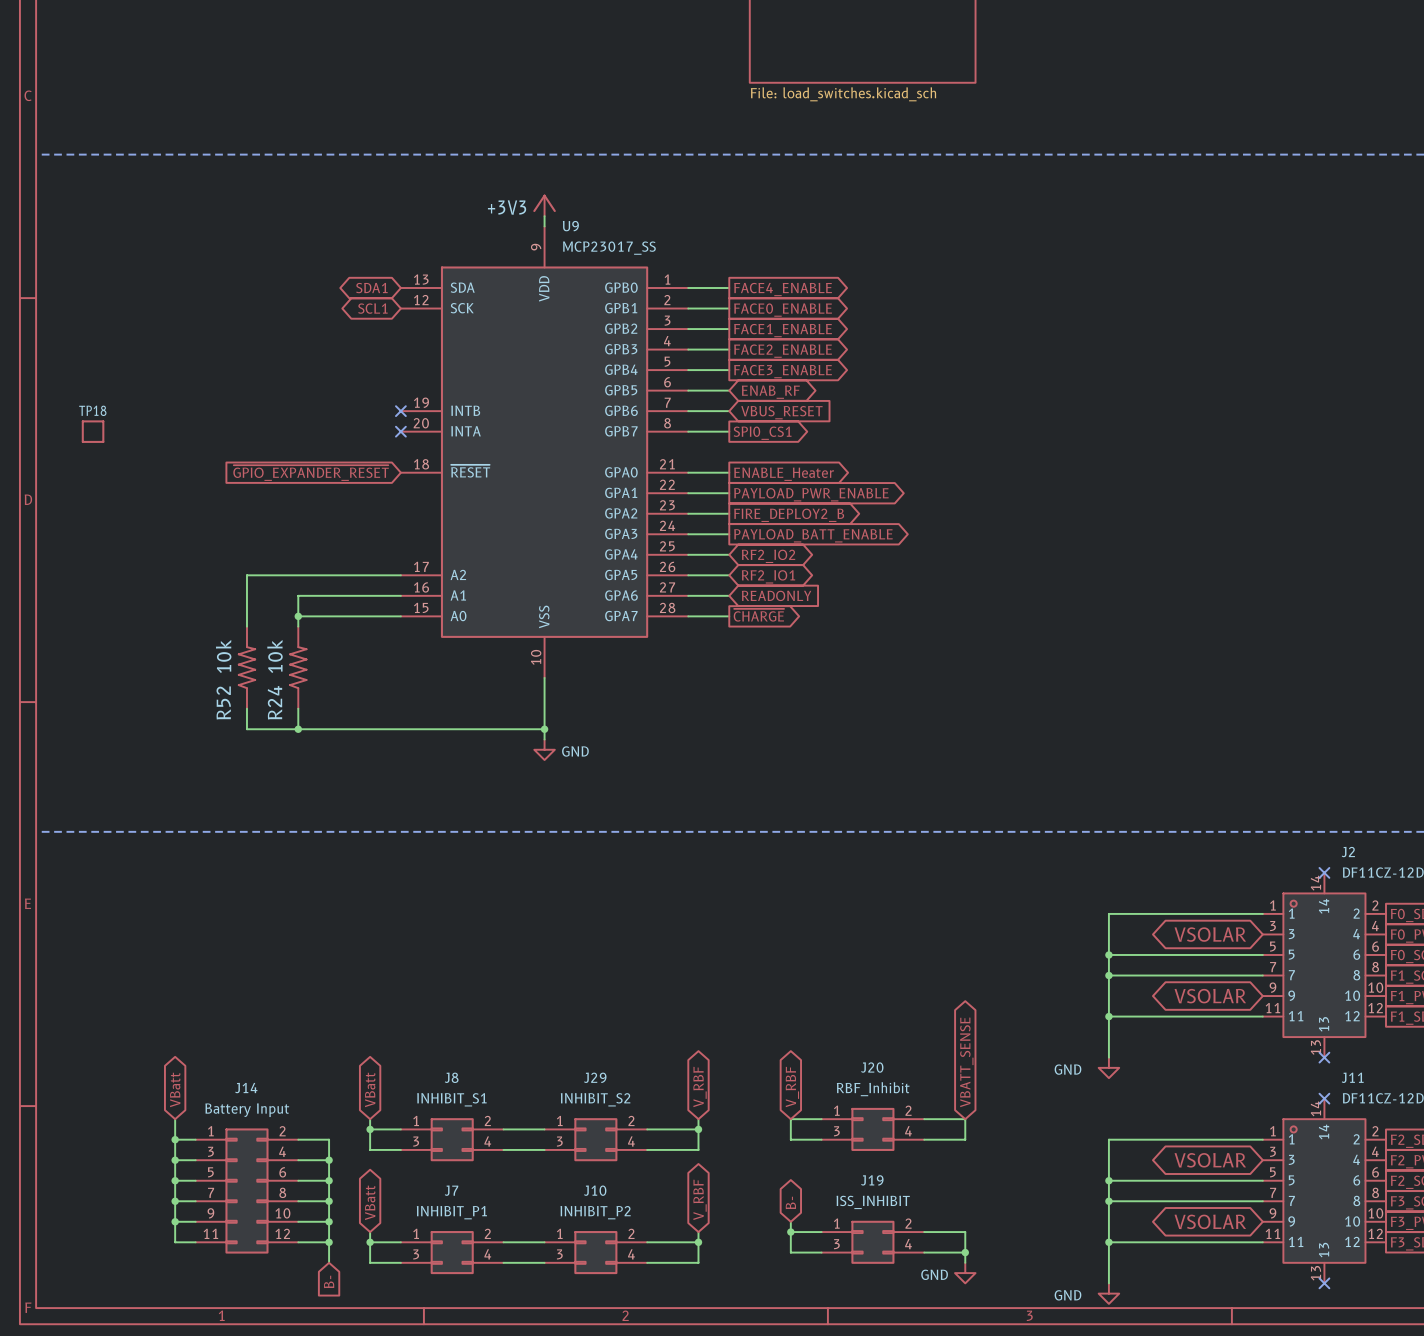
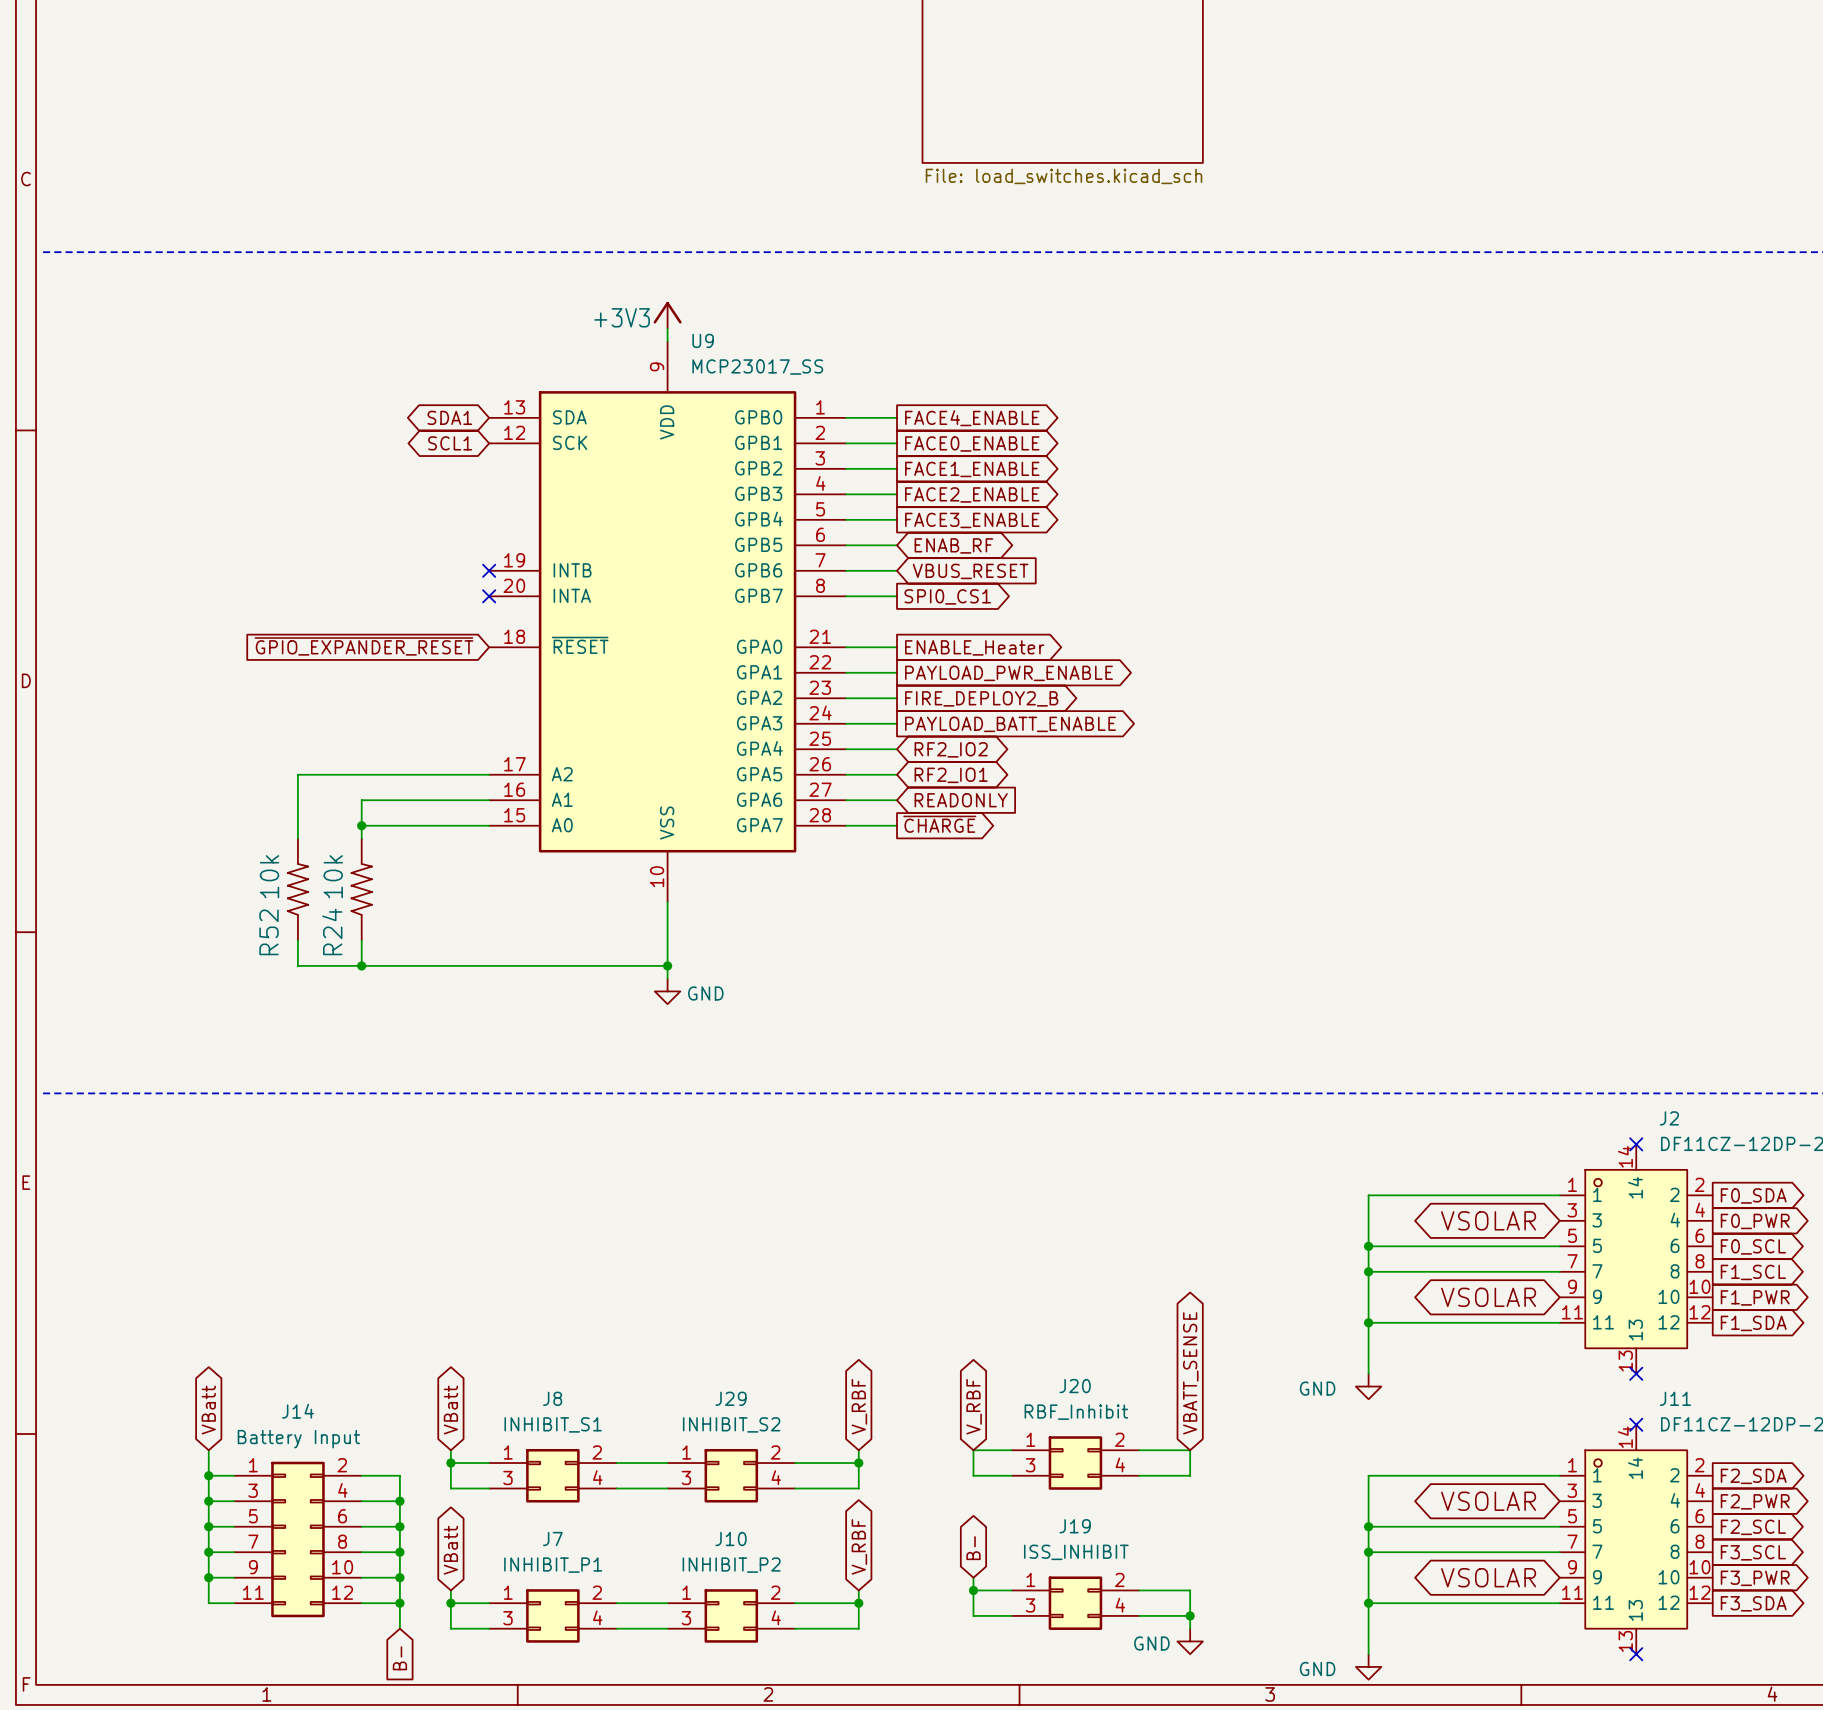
TP18: (93, 431) -> none

